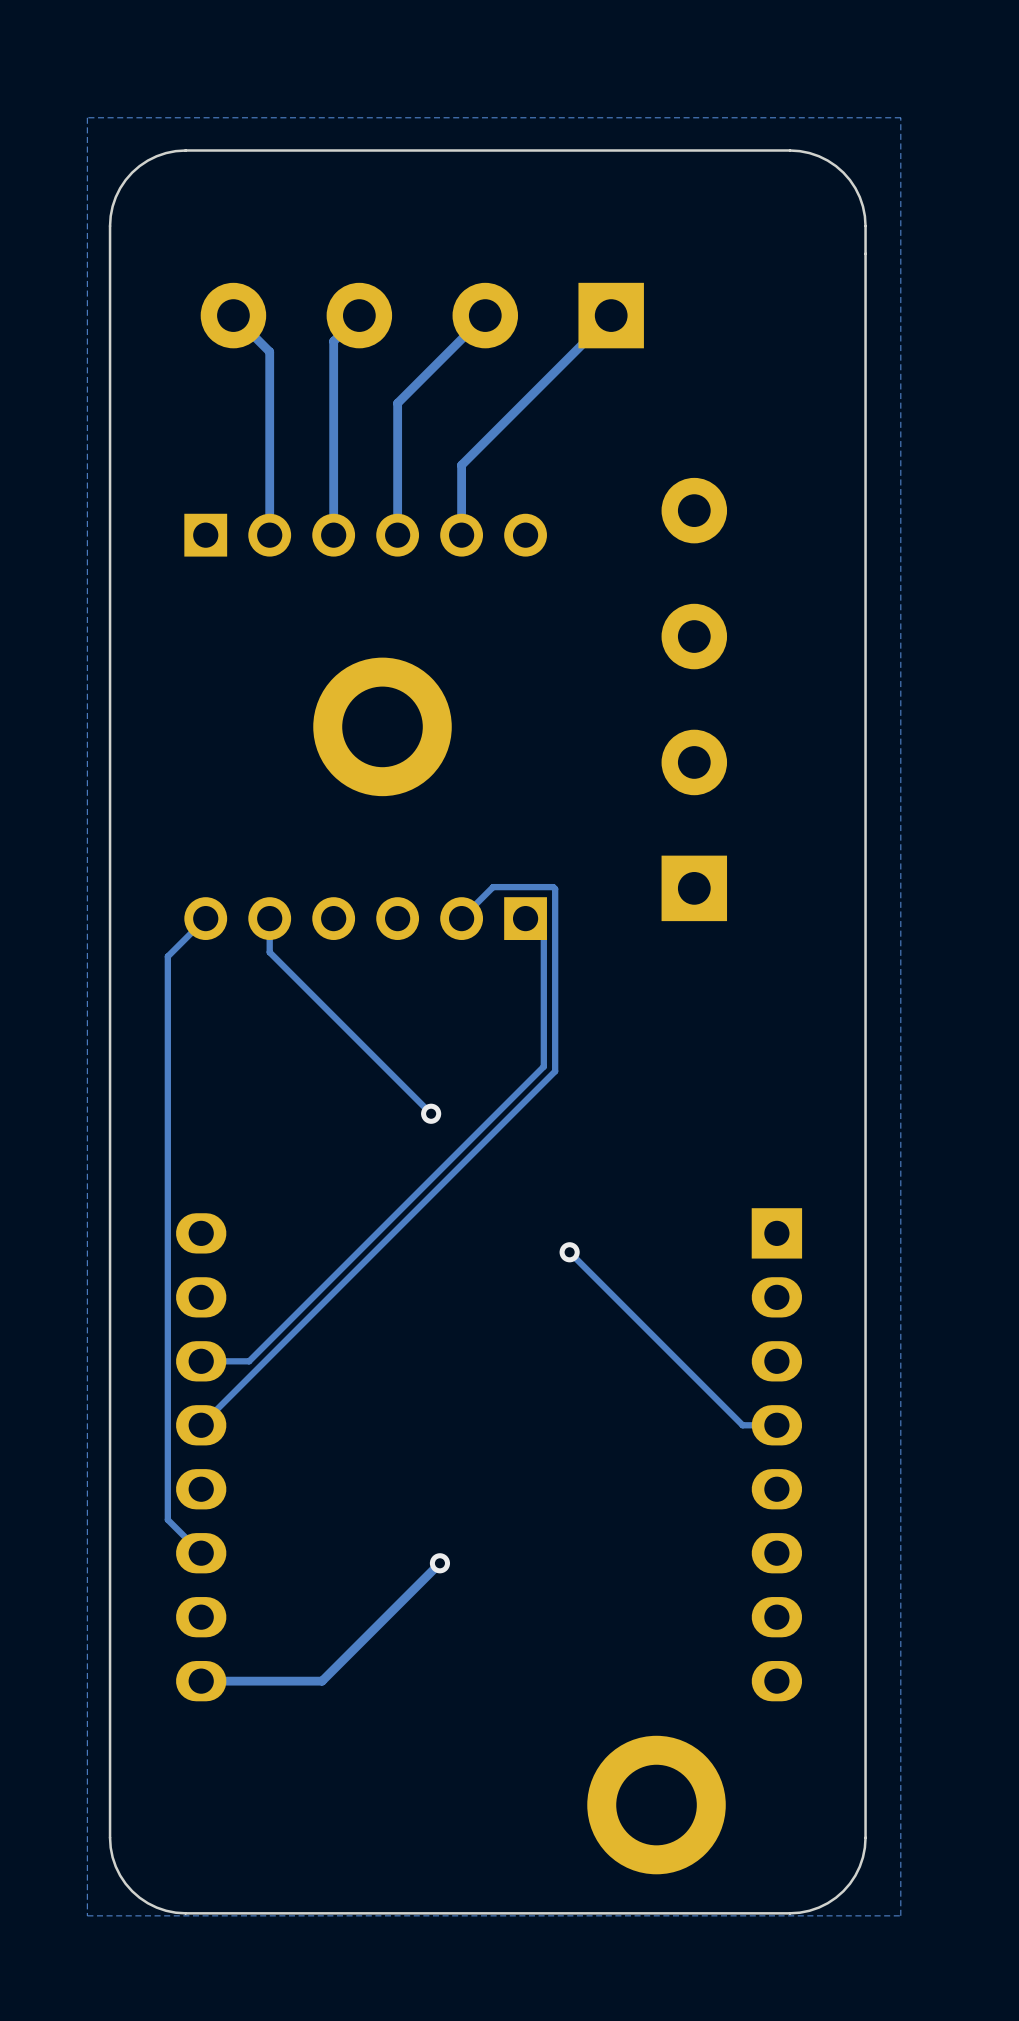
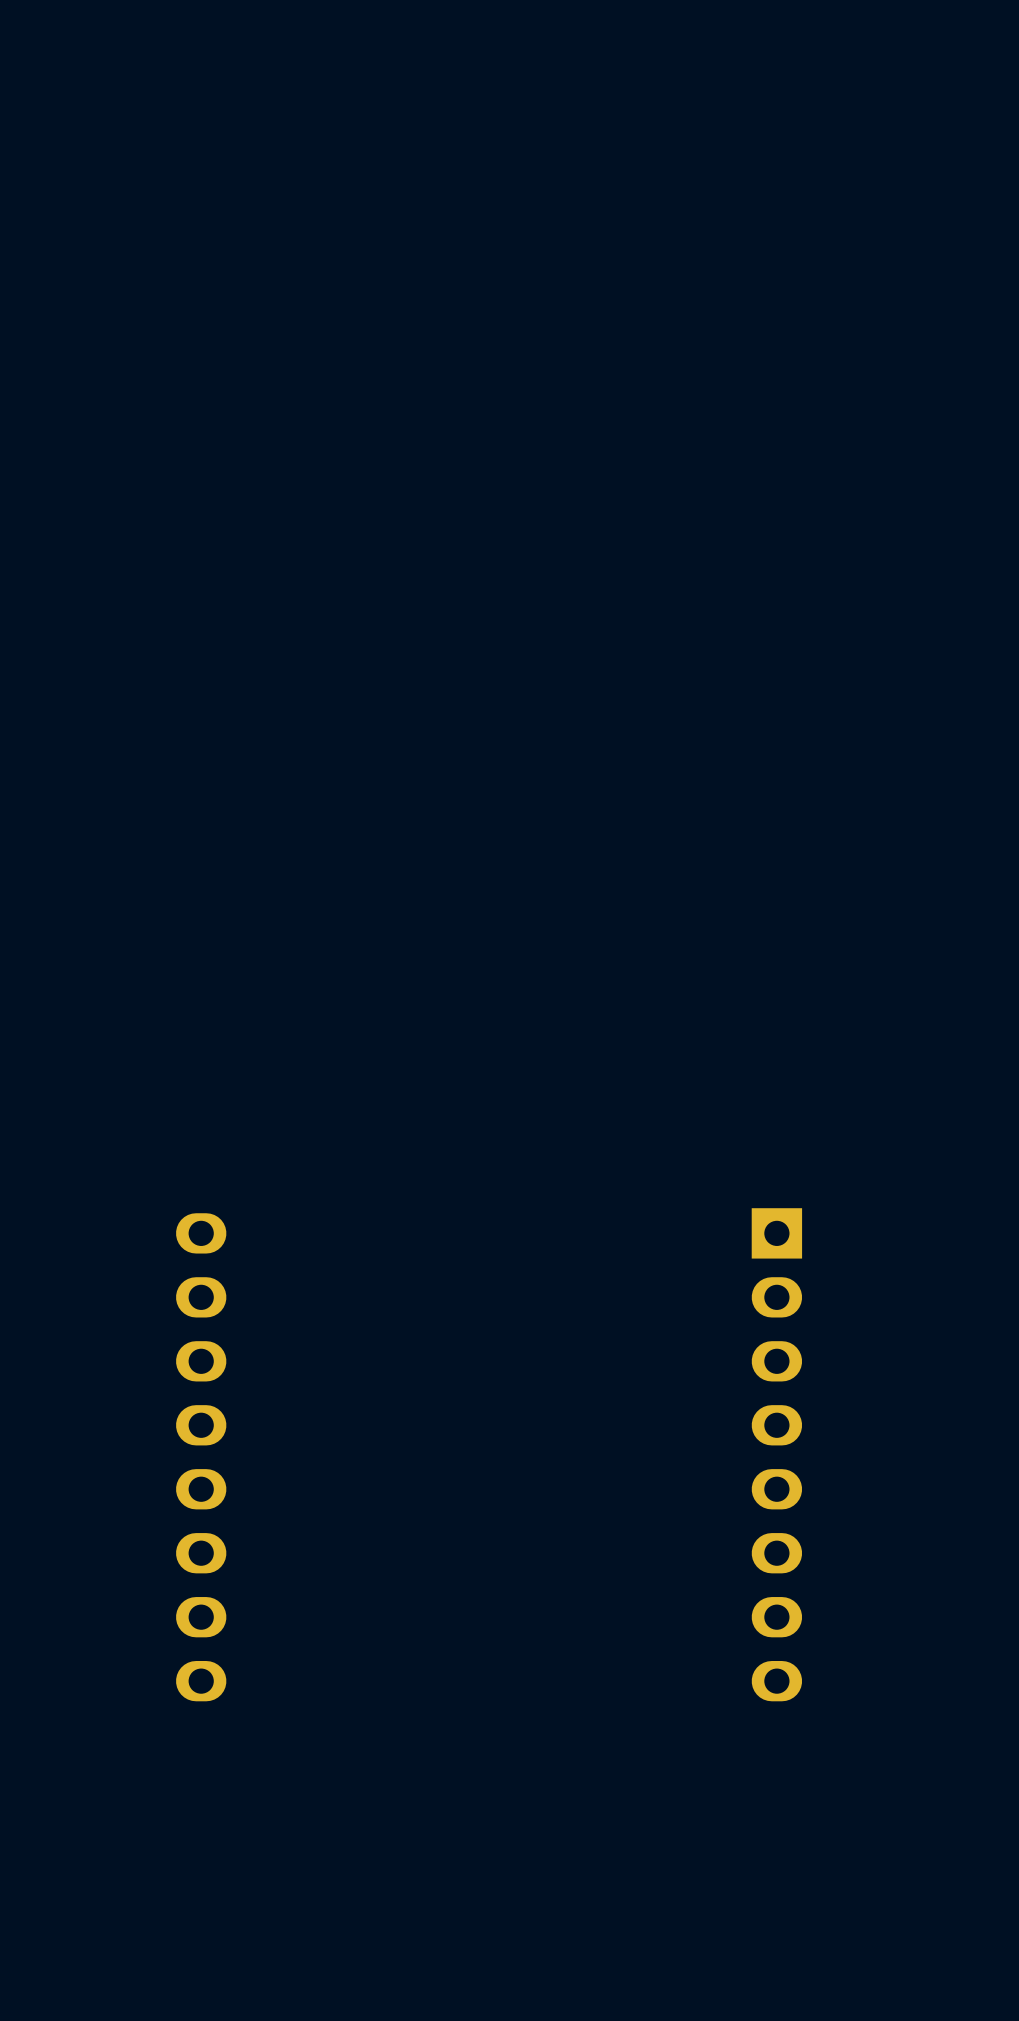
zone outline: (900, 117) (900, 1915) (87, 1915) (87, 117) (900, 117) -> none
board edge: (789, 150) (175, 151) (156, 156) (139, 166) (125, 180) (115, 197) (110, 226) (110, 1837) (112, 1857) (125, 1883) (139, 1897) (156, 1907) (185, 1913) (789, 1913) (809, 1910) (835, 1897) (849, 1883) (859, 1866) (865, 1837) (865, 226) (859, 197) (843, 172) (818, 156) (789, 150) -> none
track: (233, 315) (269, 351) (269, 535) -> none
track: (359, 315) (333, 341) (333, 535) -> none
part: (422, 315) -> none
track: (485, 315) (397, 403) (397, 535) -> none
track: (611, 315) (461, 465) (461, 535) -> none
part: (365, 535) -> none
part: (694, 699) -> none
part: (382, 726) -> none
track: (205, 918) (167, 956) (167, 1519) (201, 1553) -> none
track: (269, 918) (269, 952) (431, 1113) -> none
part: (365, 918) -> none
track: (461, 918) (493, 887) (553, 887) (555, 889) (555, 1071) (201, 1425) -> none
track: (525, 918) (543, 936) (543, 1066) (249, 1361) (201, 1361) -> none
via: (431, 1113) -> none
track: (569, 1252) (742, 1425) (776, 1425) -> none
via: (569, 1252) -> none
track: (439, 1563) (322, 1681) (201, 1681) -> none
via: (439, 1563) -> none
part: (656, 1805) -> none

